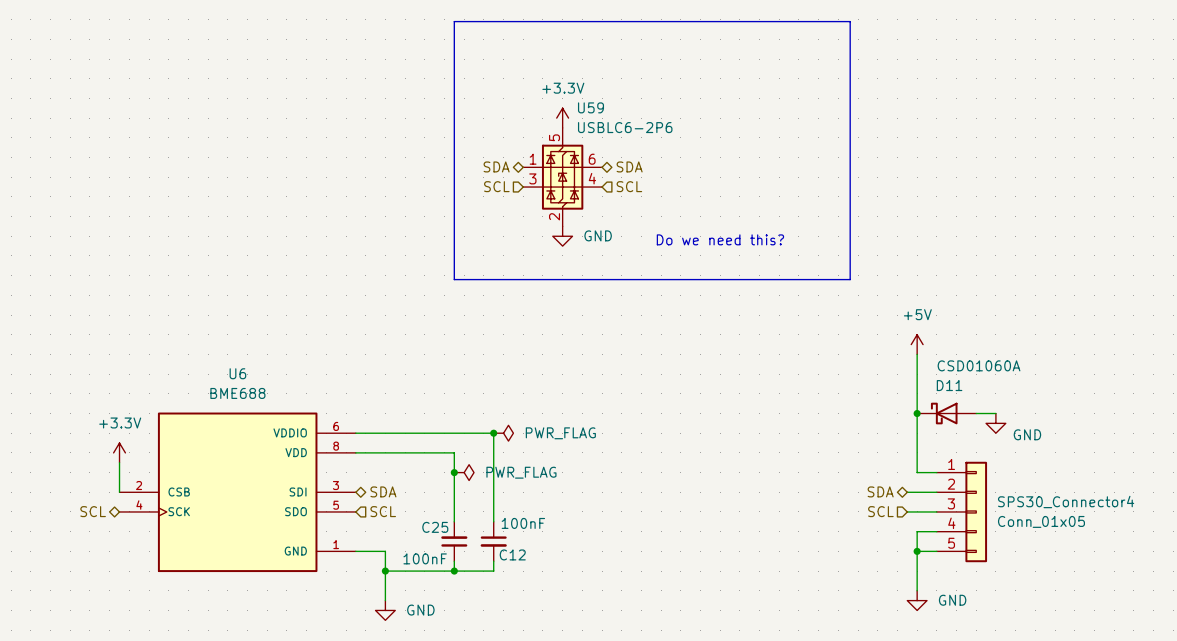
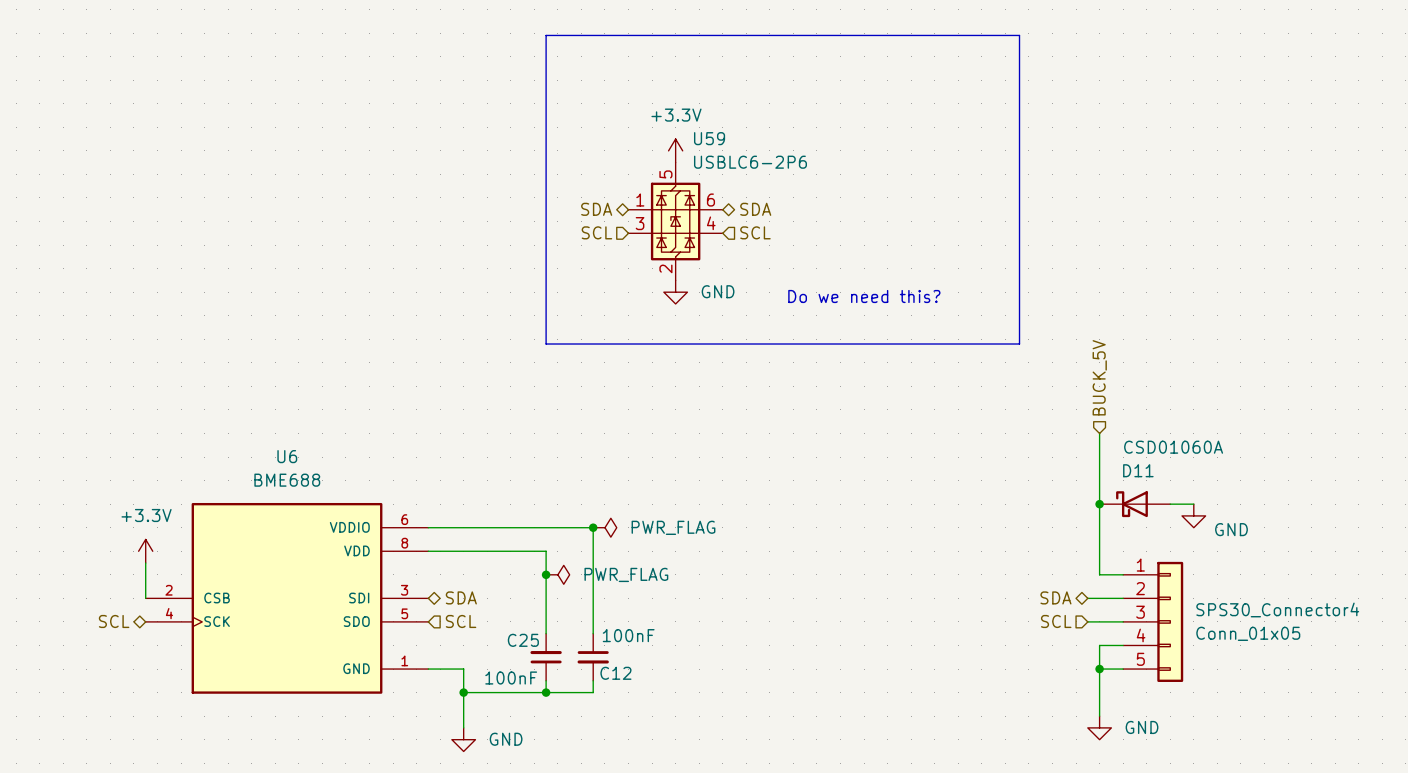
hierarchical label: none -> BUCK_5V (1099, 377)
power symbol: +5V (917, 344) -> none

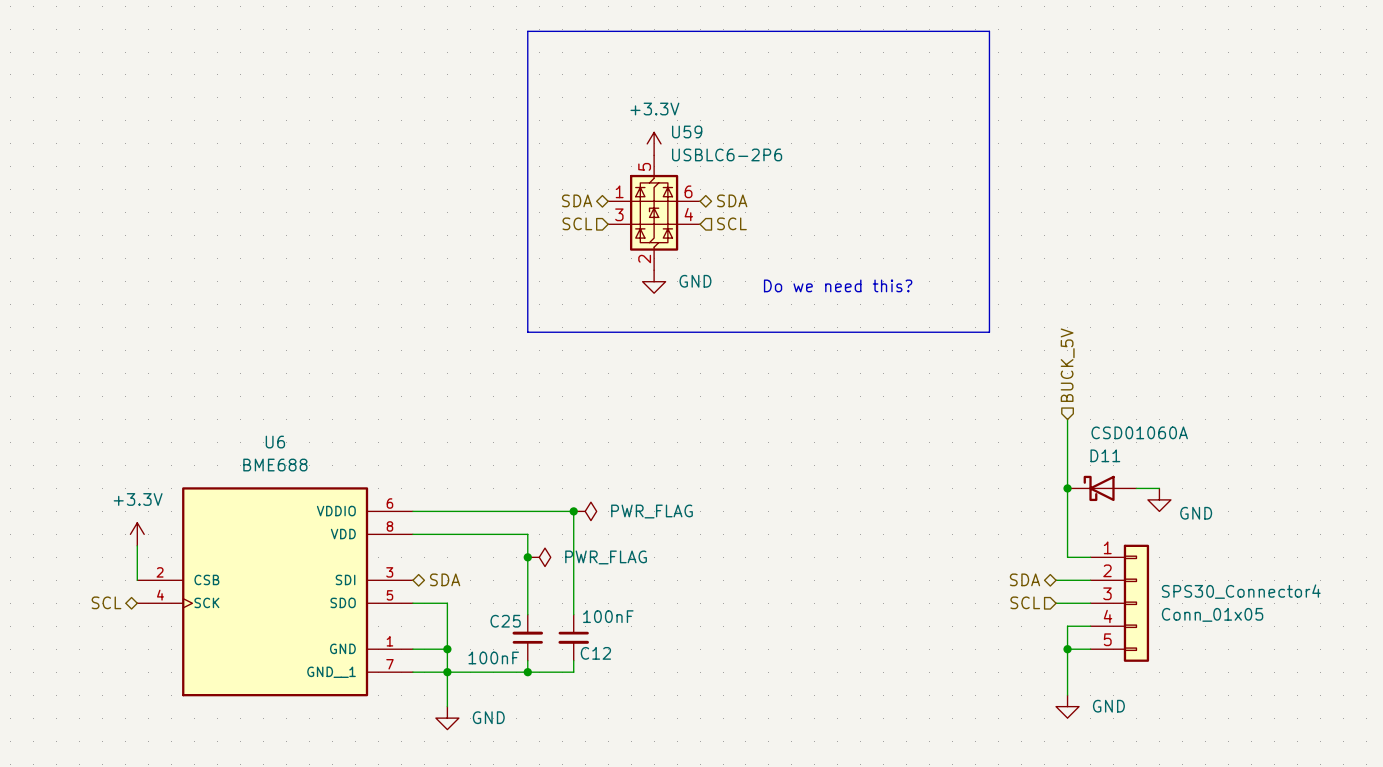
U6 symbol: [145, 502, 429, 694] -> [137, 487, 413, 697]
wire: none -> (412, 603) (447, 603) (447, 649)
hierarchical label: SCL (461, 621) -> none
junction: none -> (447, 649)
wire: none -> (412, 672) (447, 672)

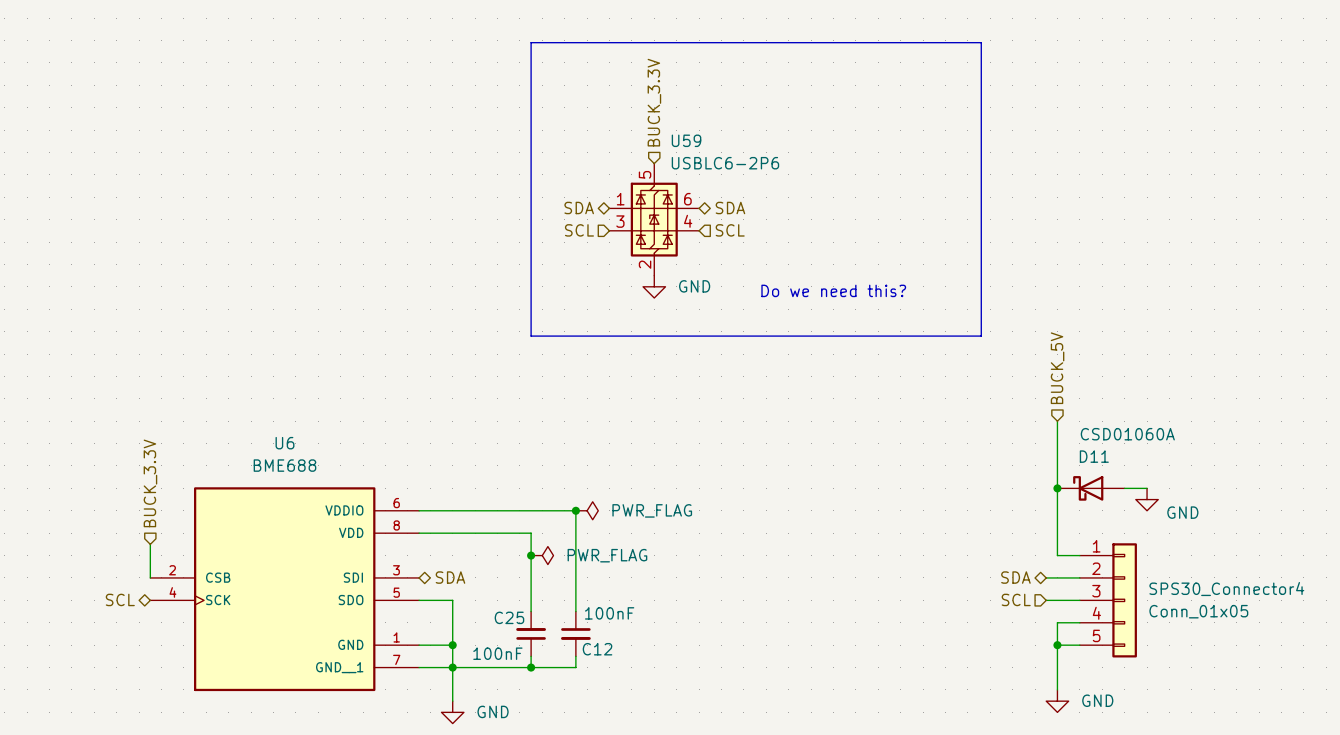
hierarchical label: none -> BUCK_3.3V (654, 102)
power symbol: +3.3V (654, 143) -> none
hierarchical label: none -> BUCK_3.3V (150, 483)
power symbol: +3.3V (137, 534) -> none

